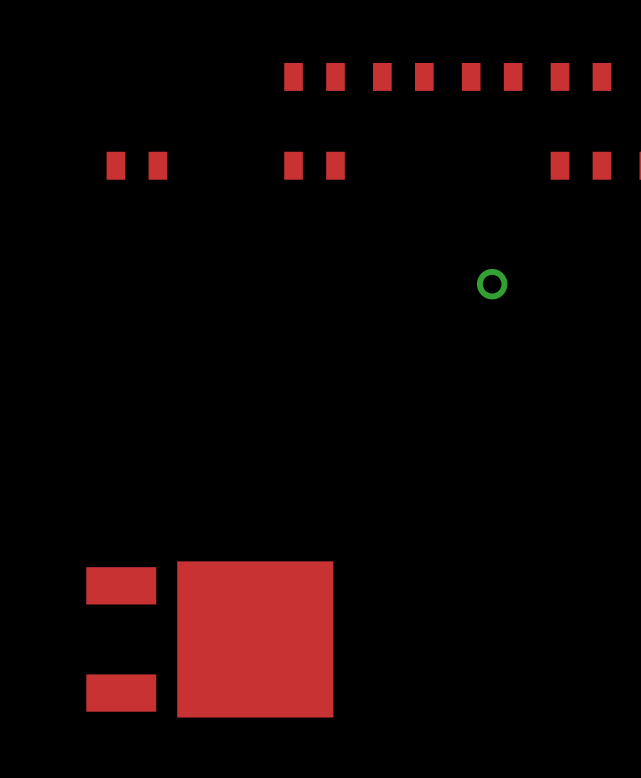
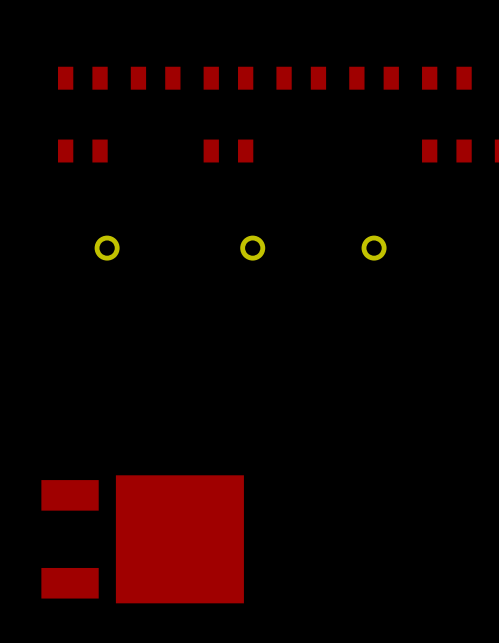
part: none -> (82, 78)
part: none -> (155, 78)
part: none -> (107, 248)
part: none -> (252, 248)

